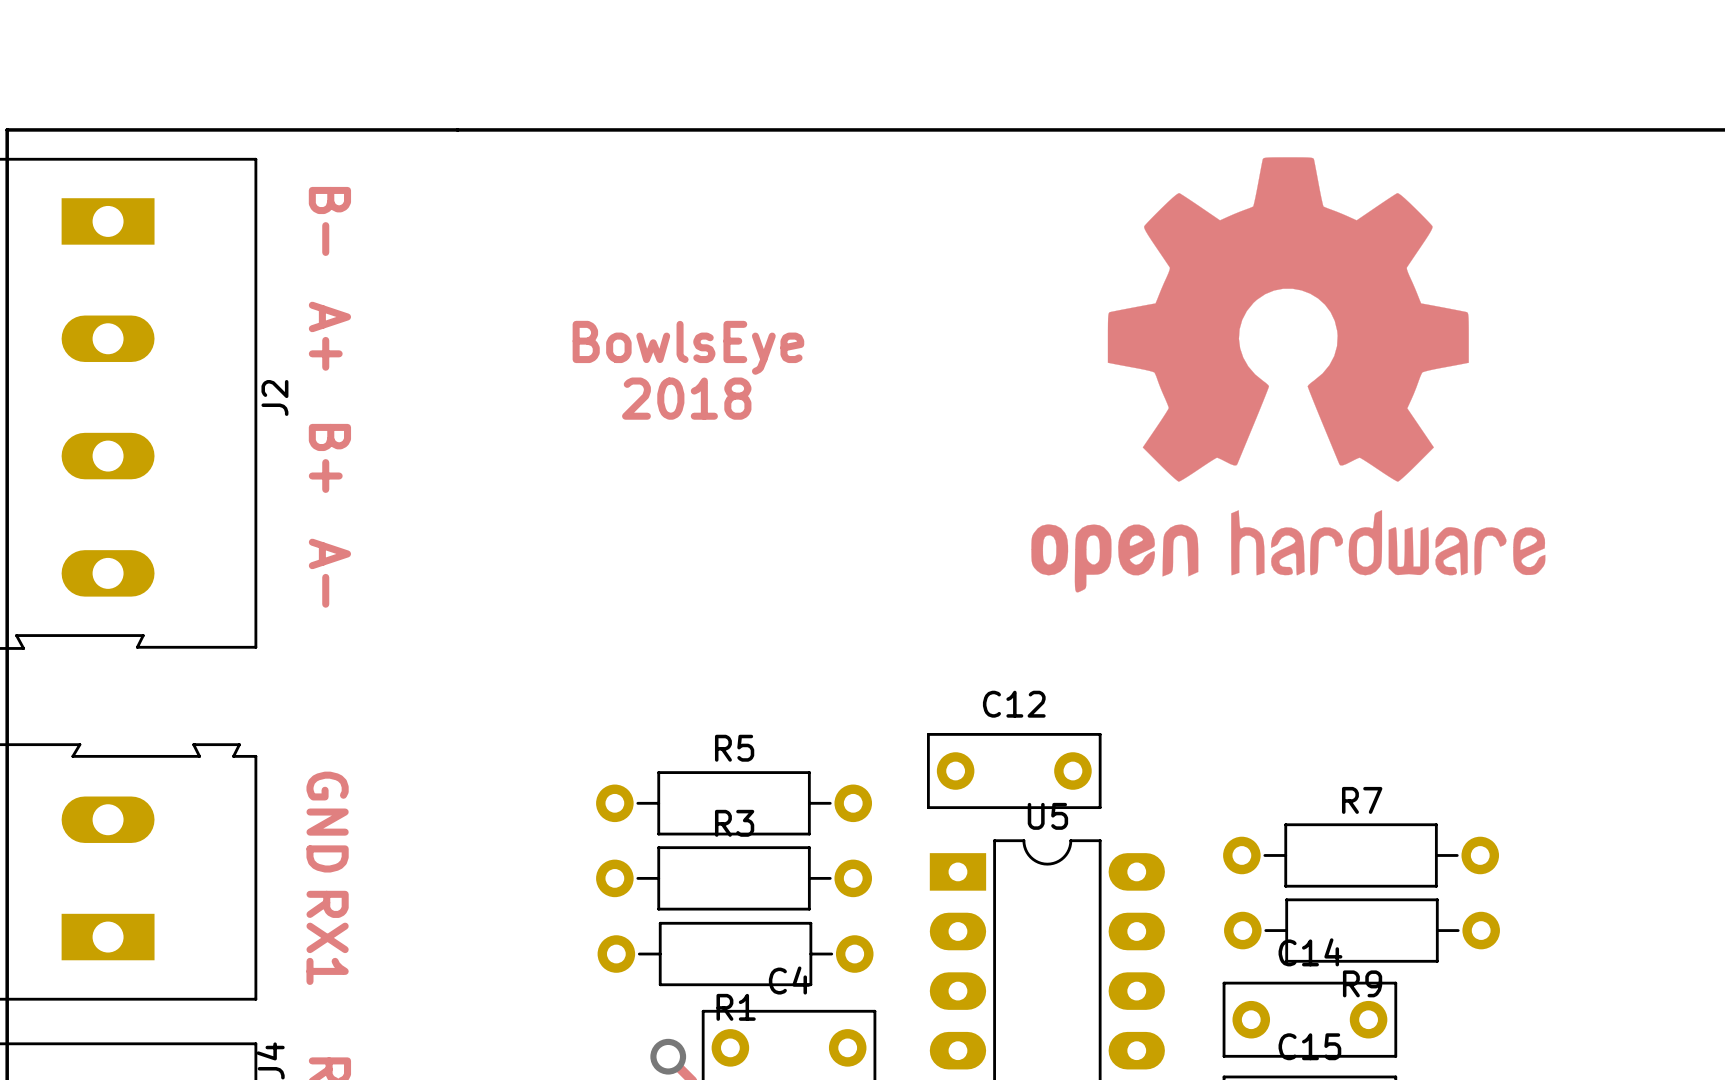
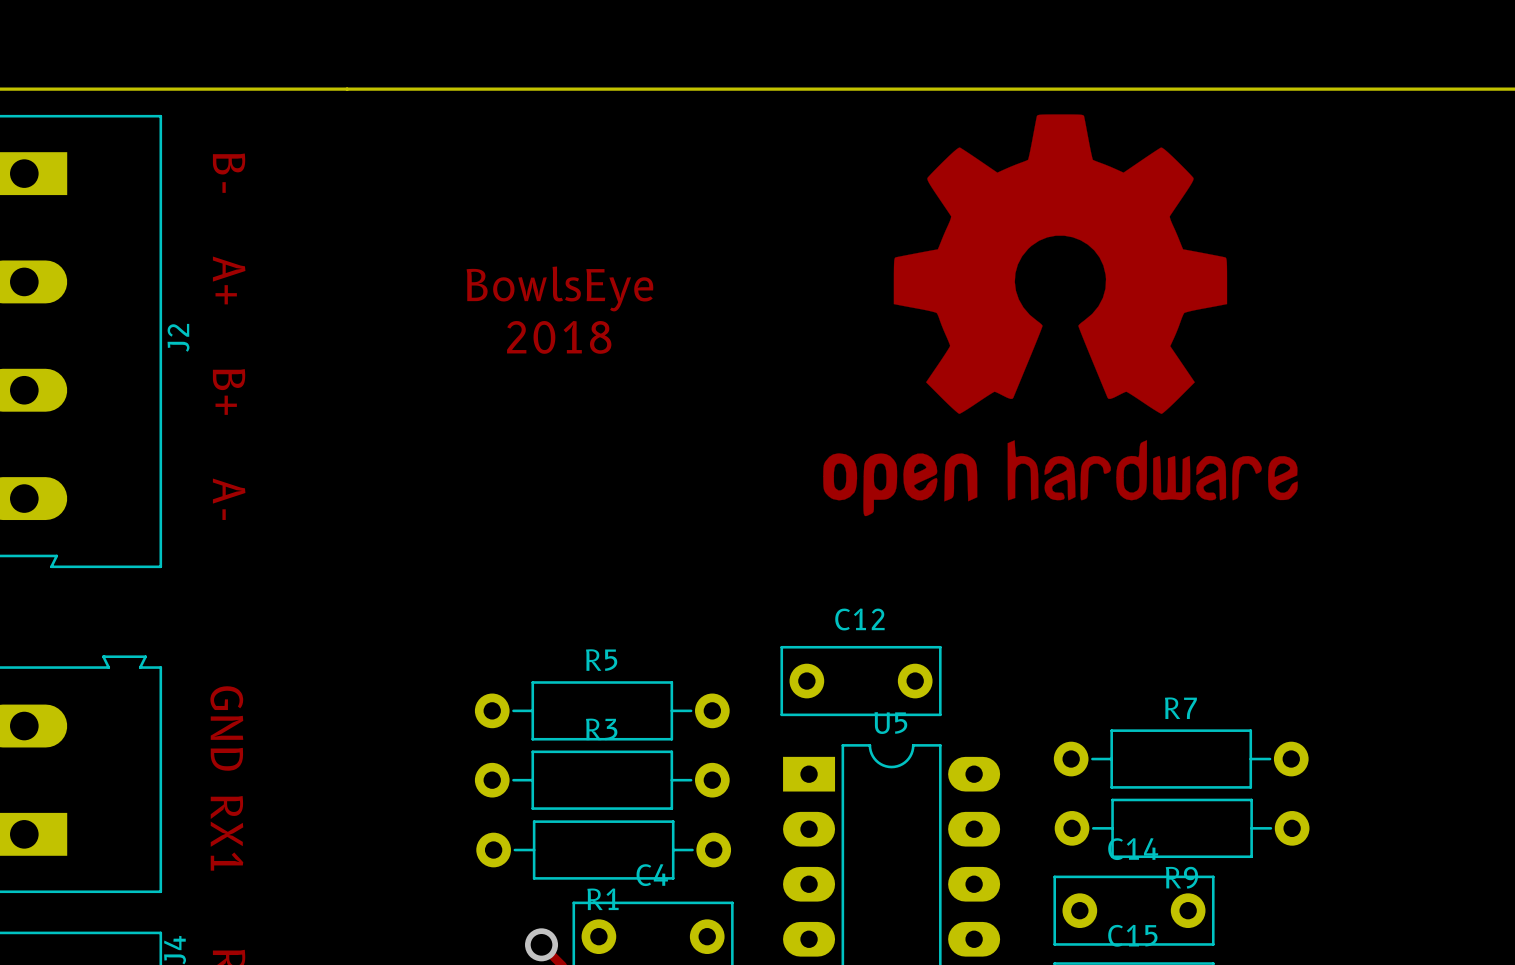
drawing position: (1288, 374) -> (1060, 315)

